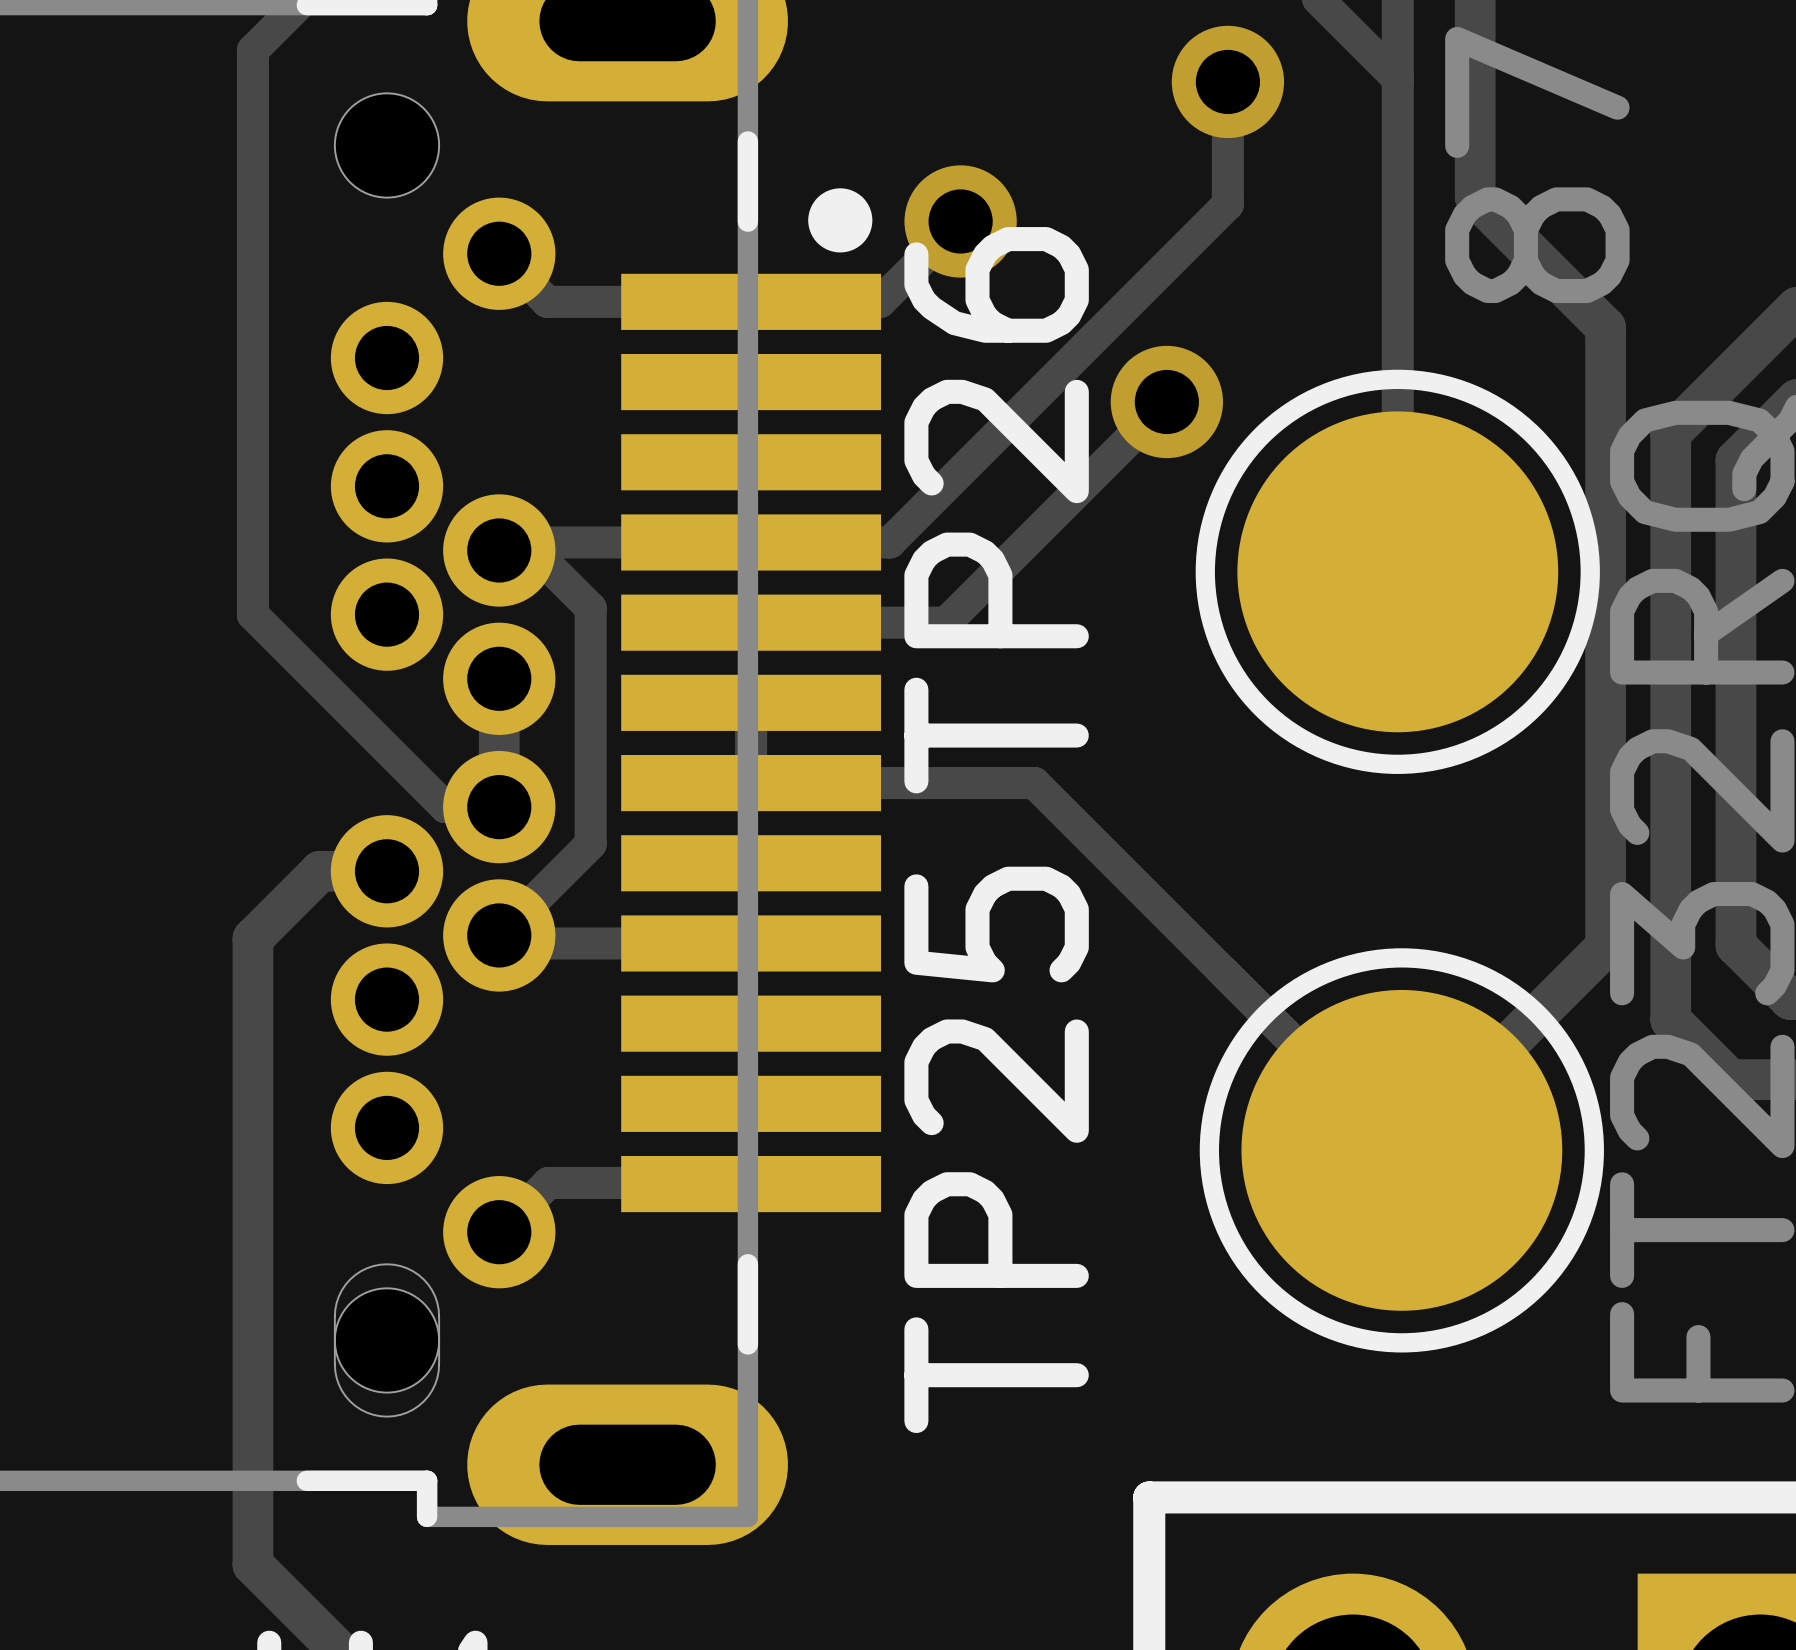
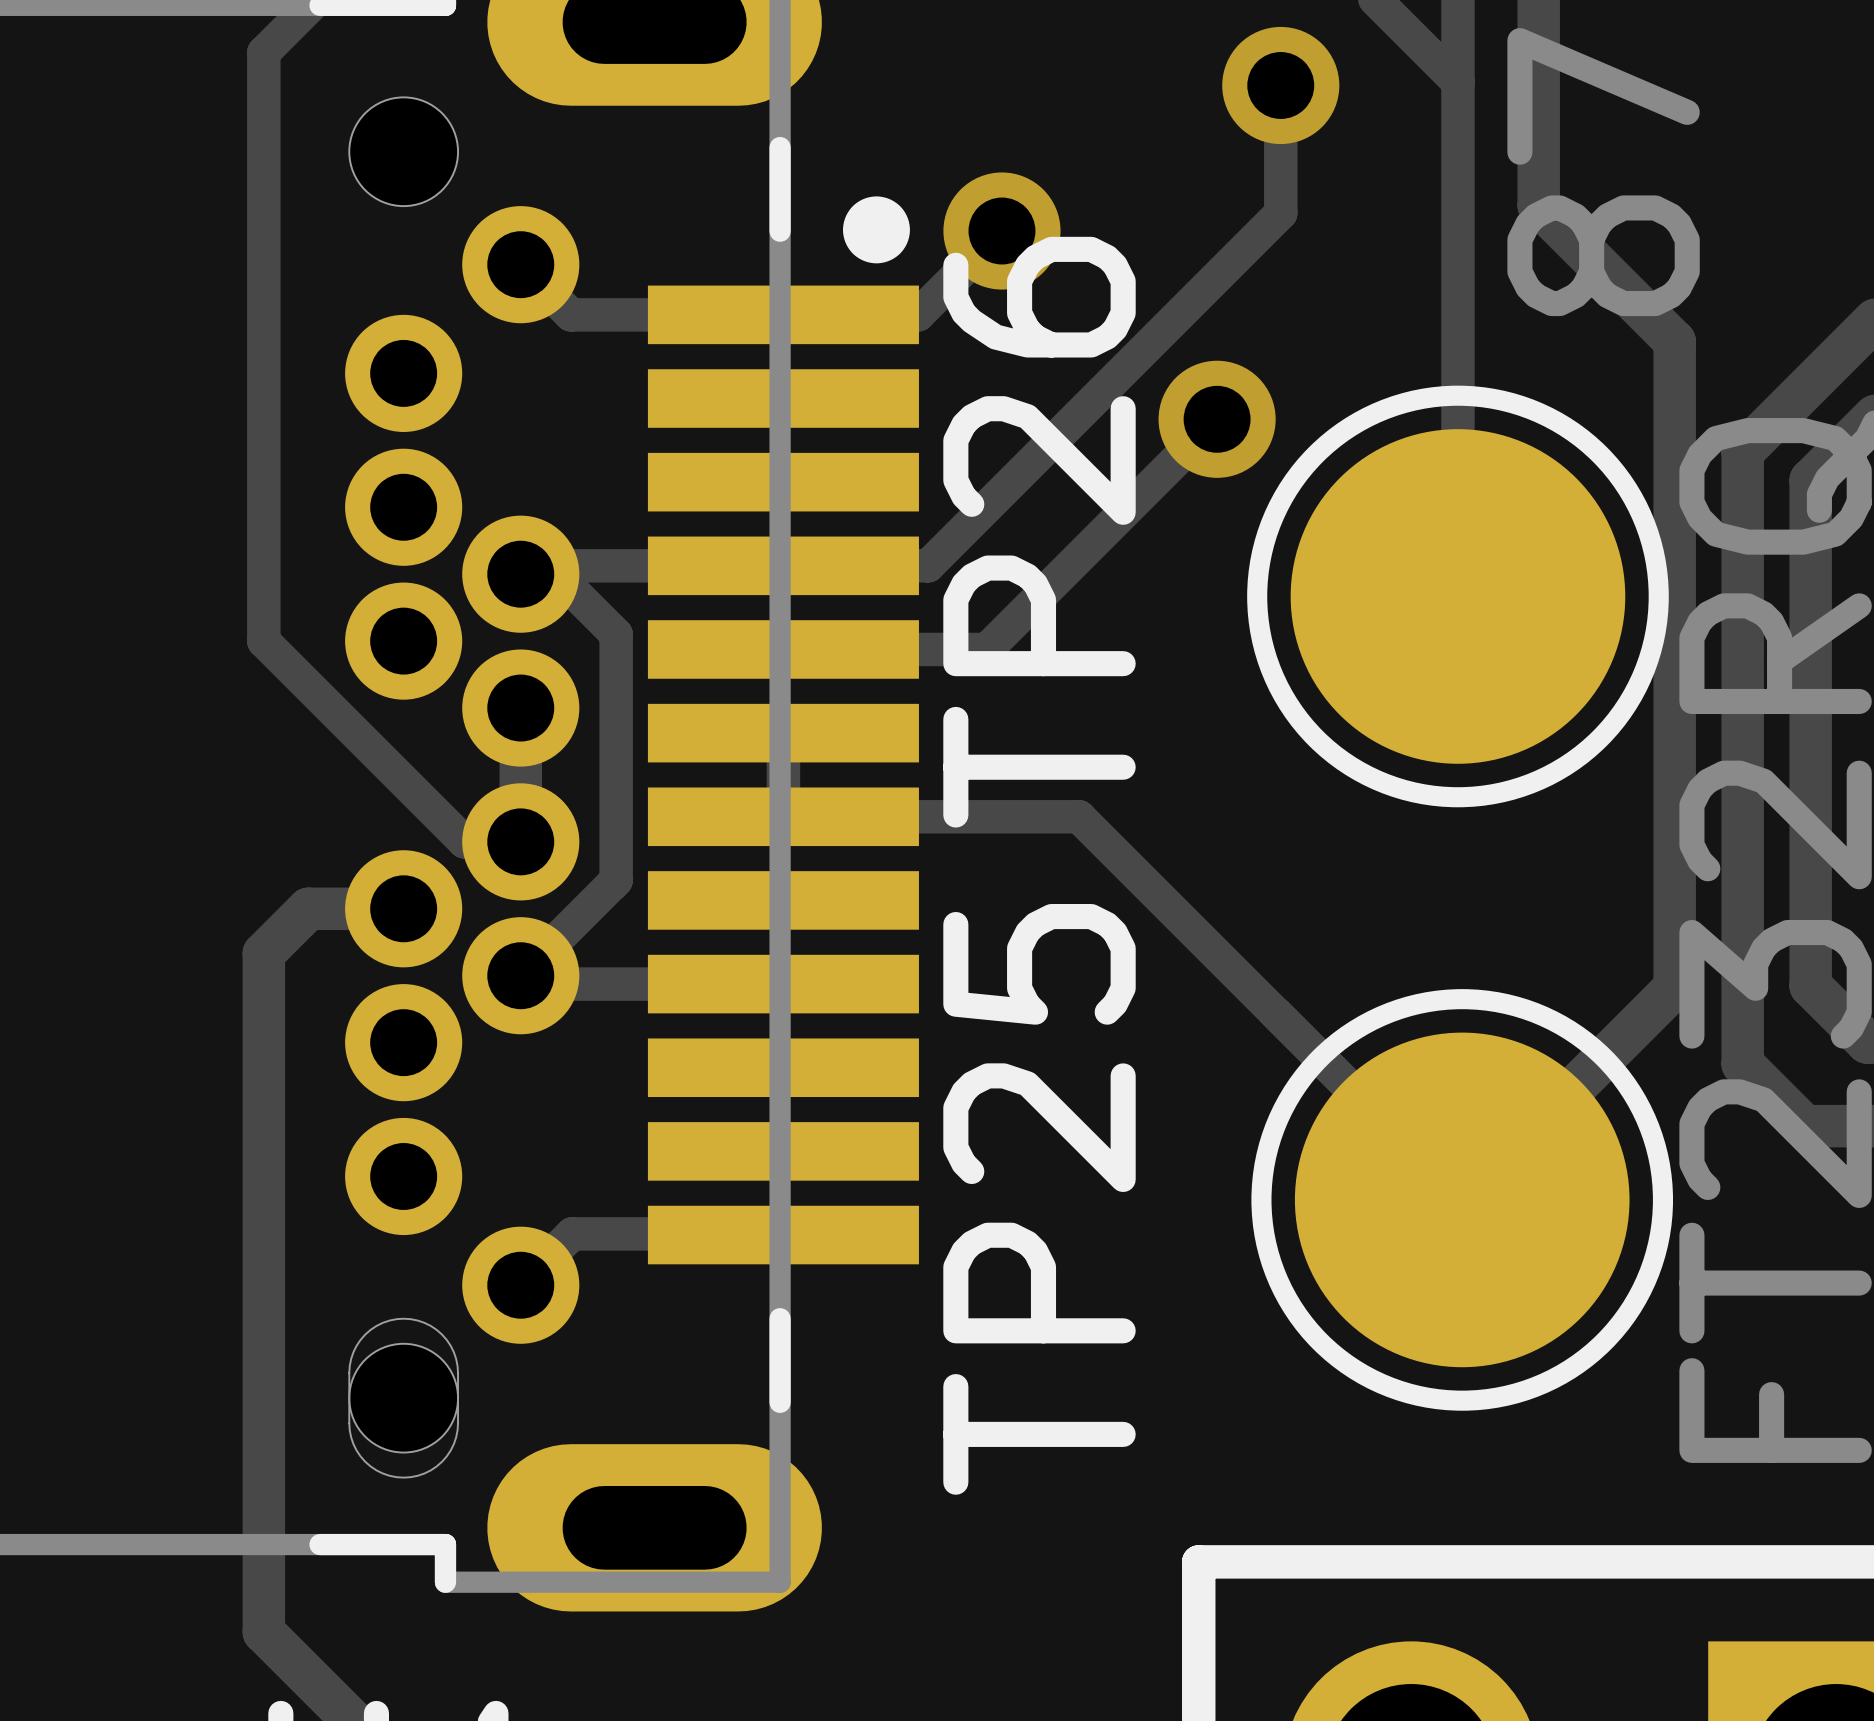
track: (320, 871) (252, 938) -> (333, 908) (308, 908) (263, 953) (263, 978)

